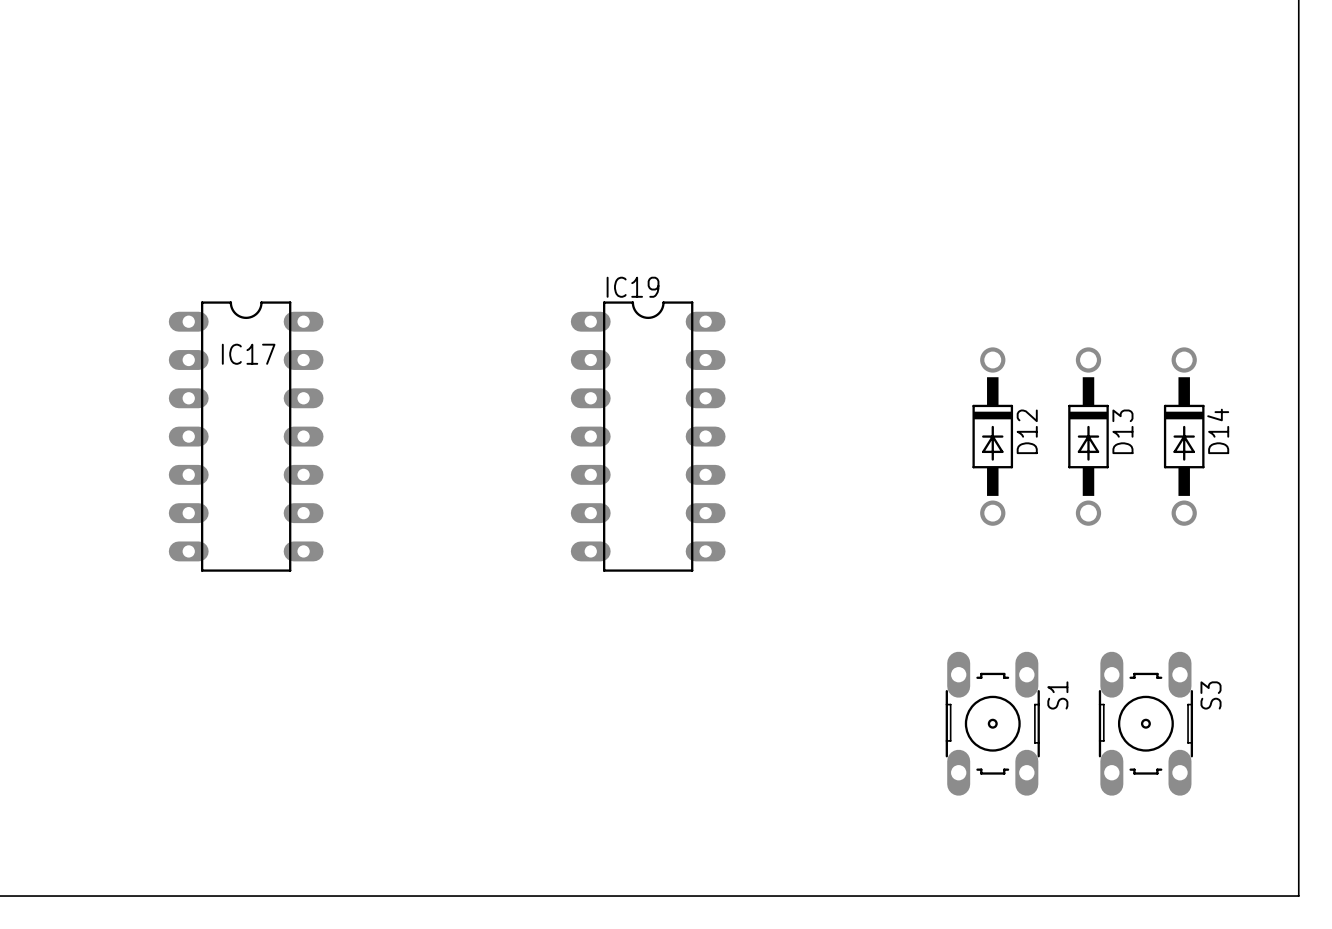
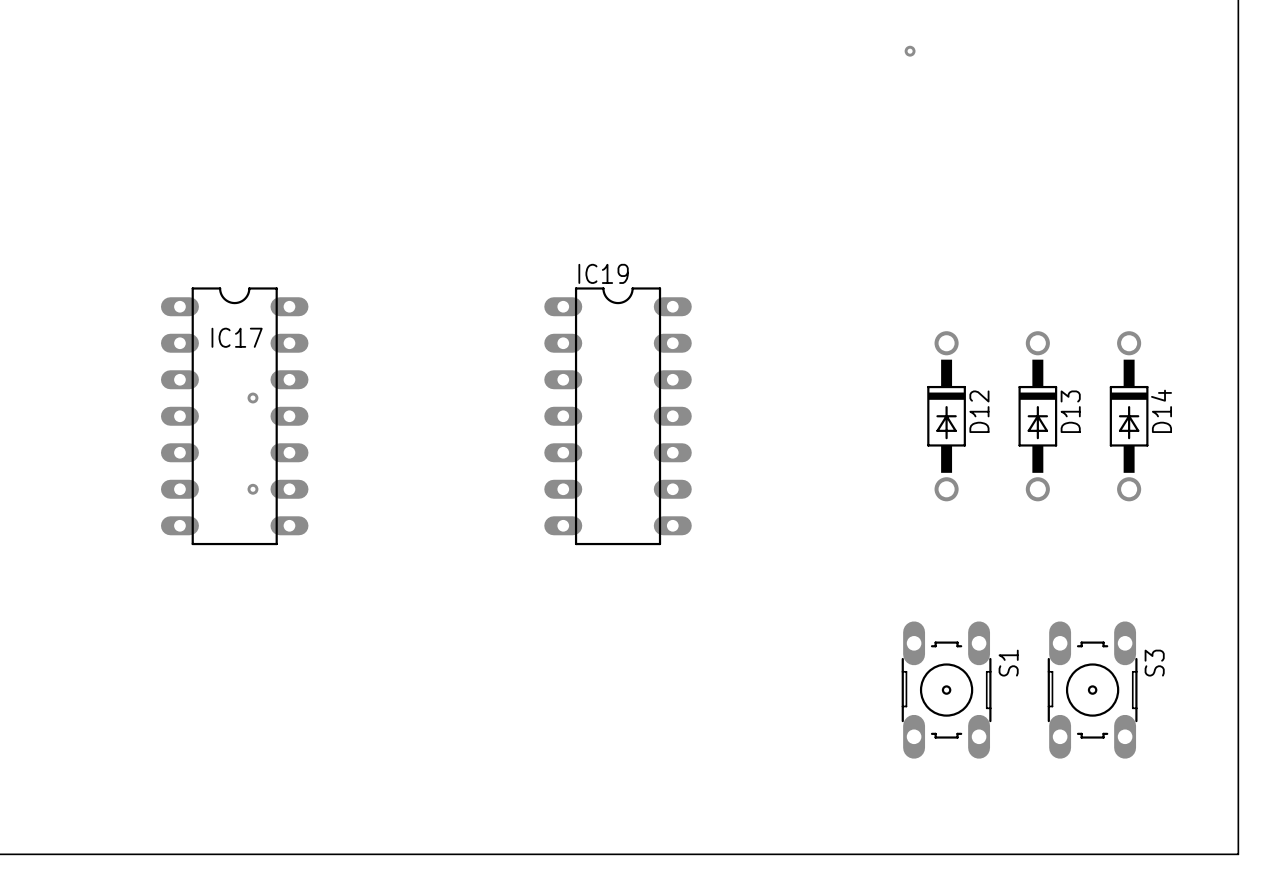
via: none -> (910, 51)
via: none -> (252, 398)
via: none -> (252, 489)

